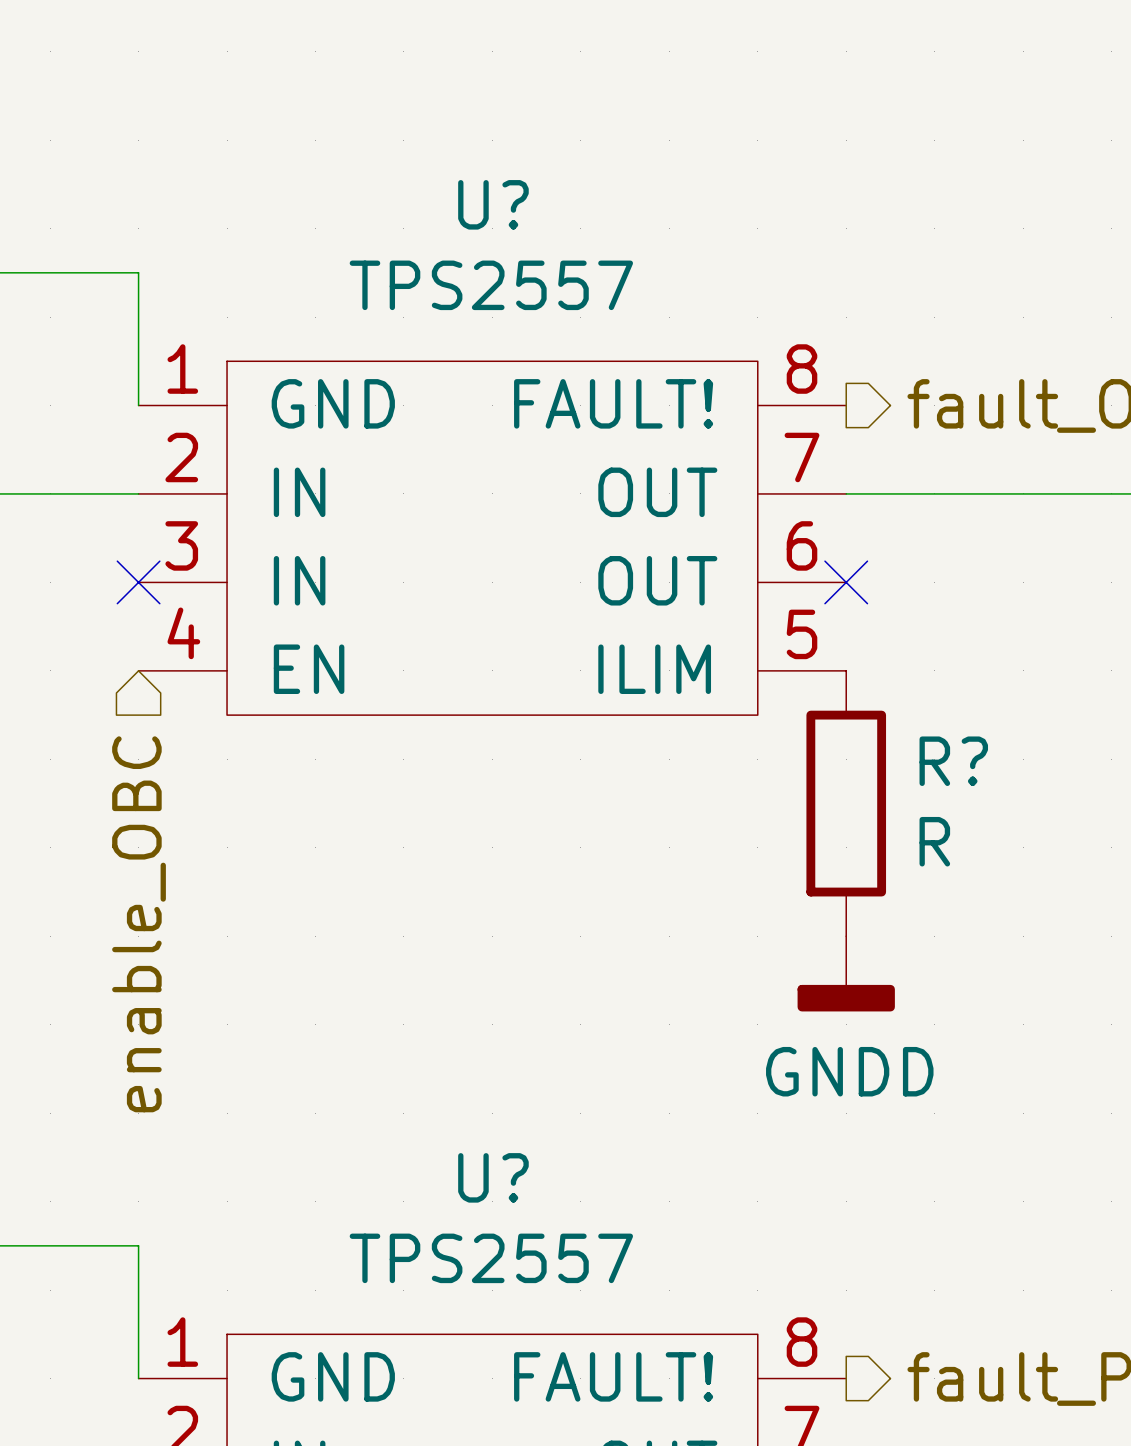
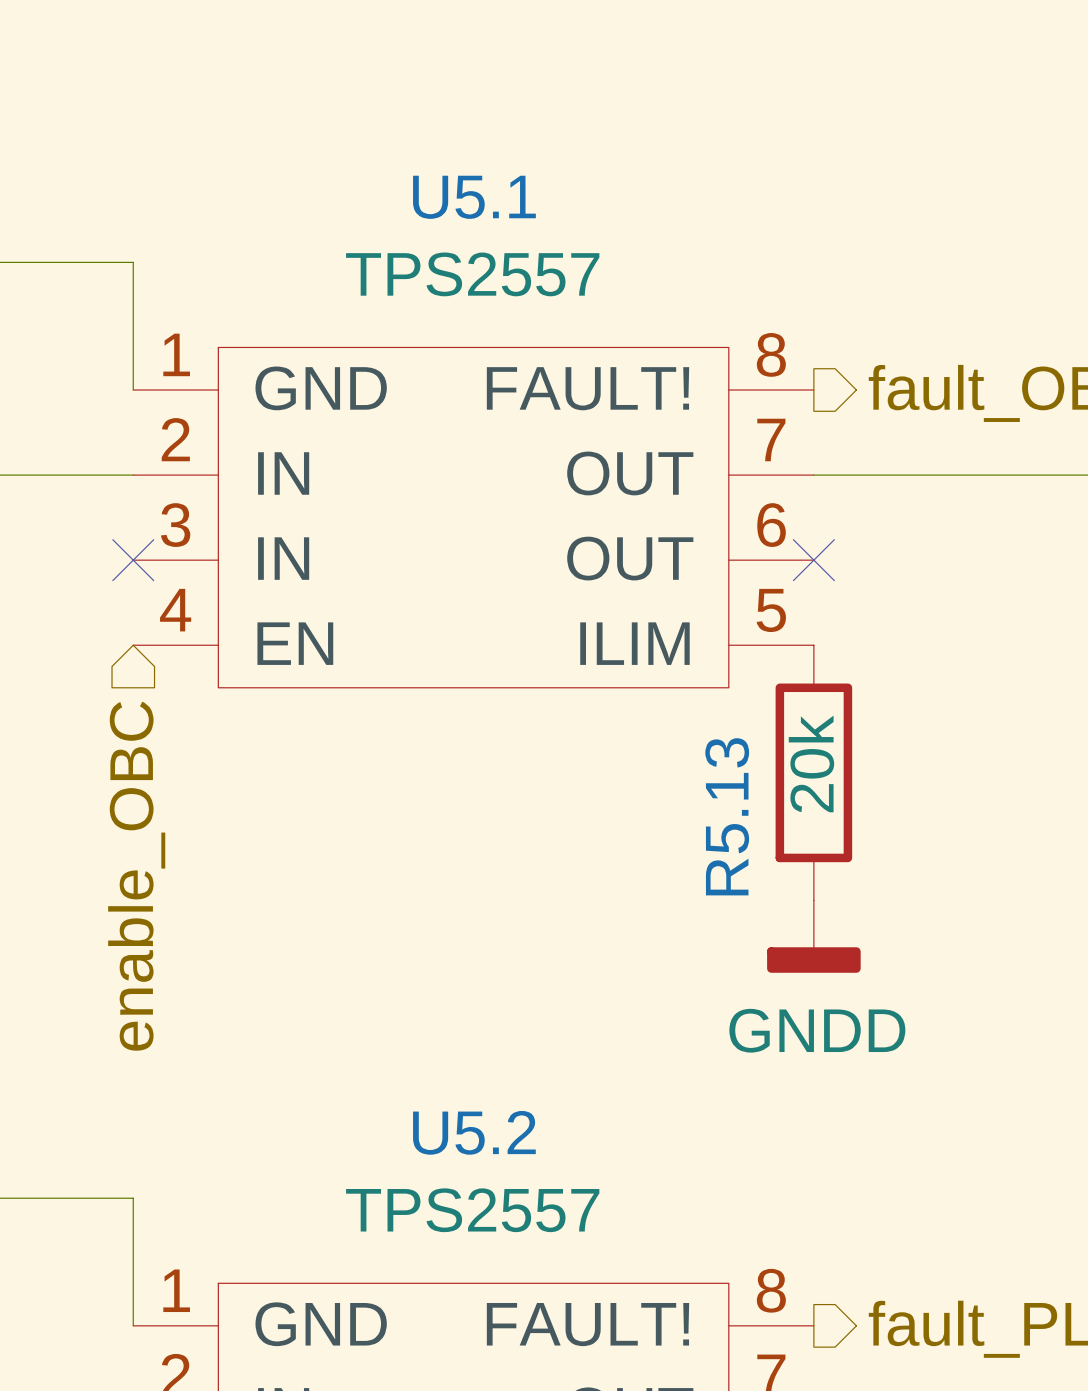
U? name: U? (493, 204) -> U5.1 (474, 197)
R? name: R? (953, 761) -> R5.13 (727, 816)
R? value: R (934, 841) -> 20k (811, 763)
U? name: U? (493, 1177) -> U5.2 (474, 1132)

